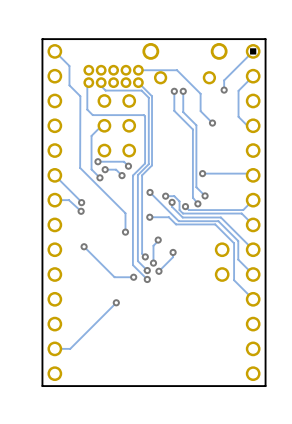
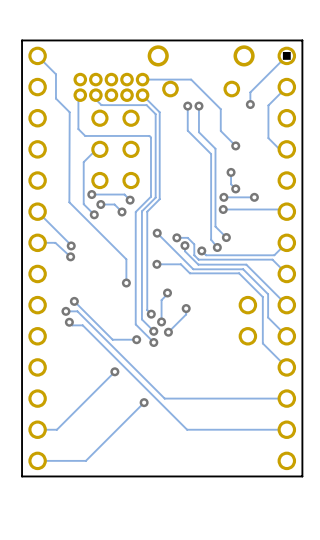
track: none -> (231, 172) (231, 184) (235, 188)
via: none -> (231, 172)
via: none -> (235, 188)
via: none -> (223, 197)
track: none -> (254, 197) (223, 197)
via: none -> (254, 197)
track: none -> (65, 311) (77, 311) (164, 398) (286, 398)
via: none -> (65, 311)
track: none -> (69, 322) (72, 325) (82, 325) (187, 429) (286, 429)
via: none -> (69, 322)
track: none -> (144, 402) (85, 460) (37, 460)
via: none -> (144, 402)

